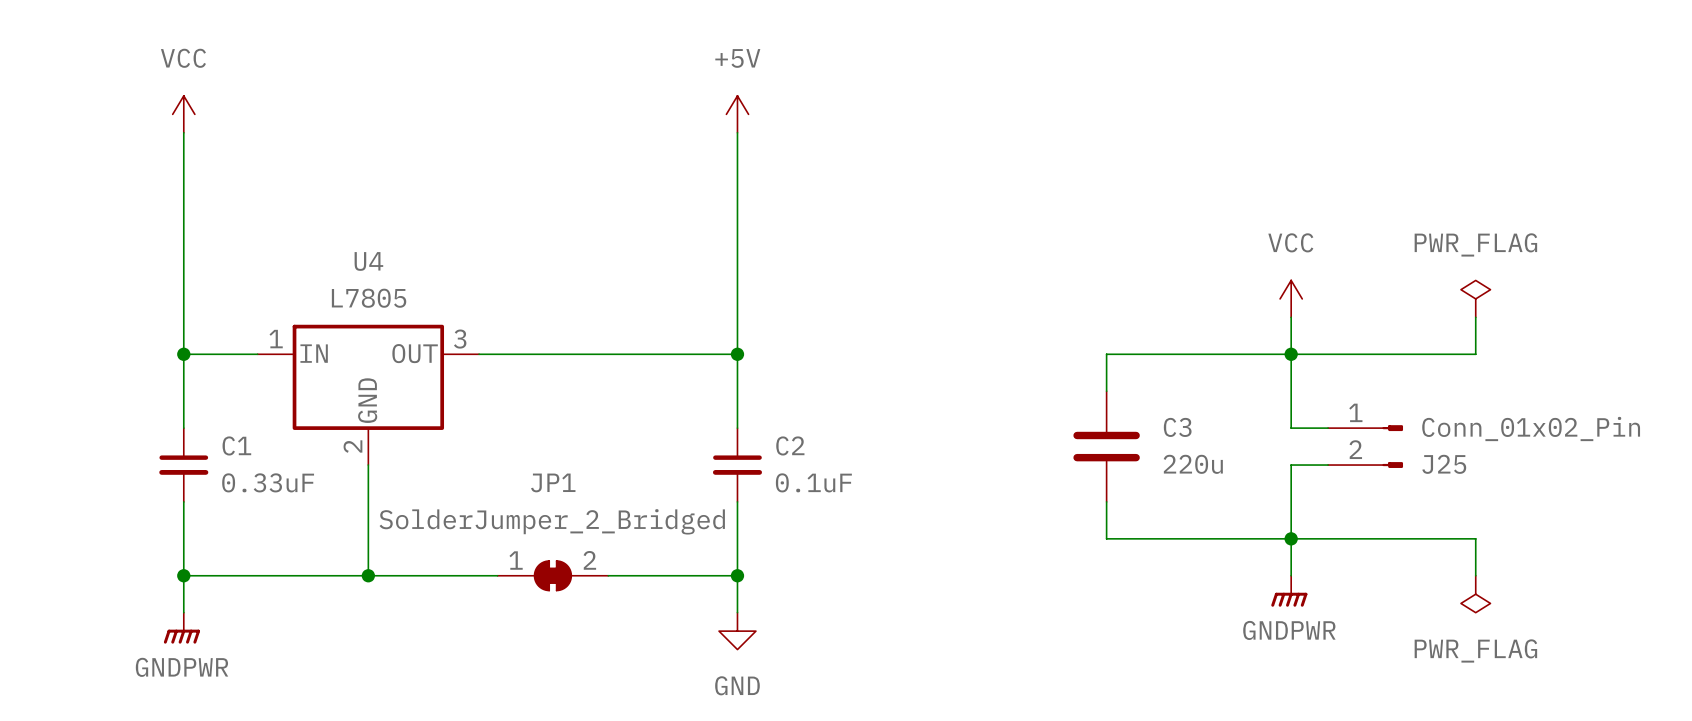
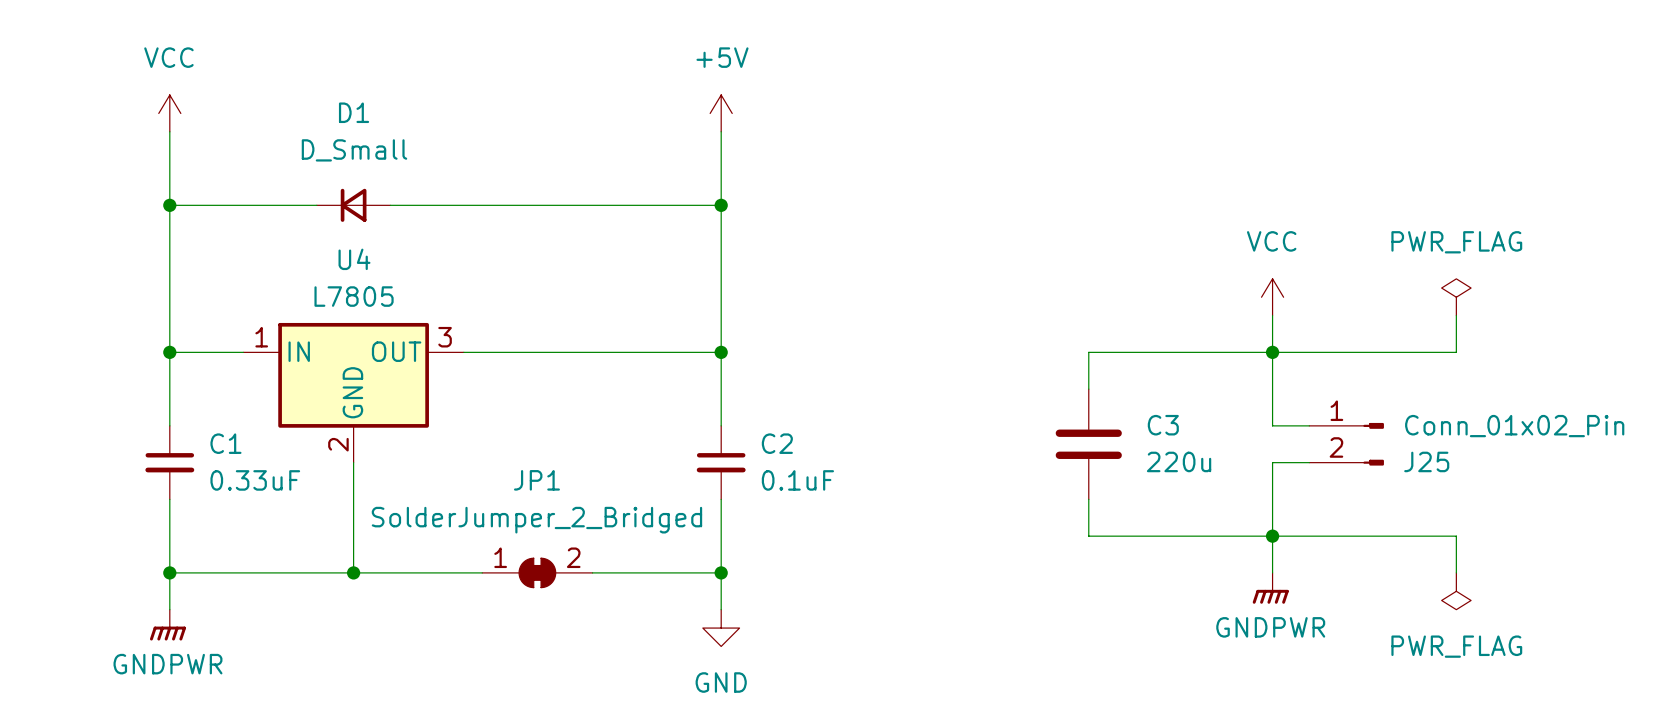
wire: none -> (169, 205) (316, 205)
junction: none -> (169, 205)
D1: none -> D_Small (353, 205)
wire: none -> (390, 205) (721, 205)
junction: none -> (721, 205)

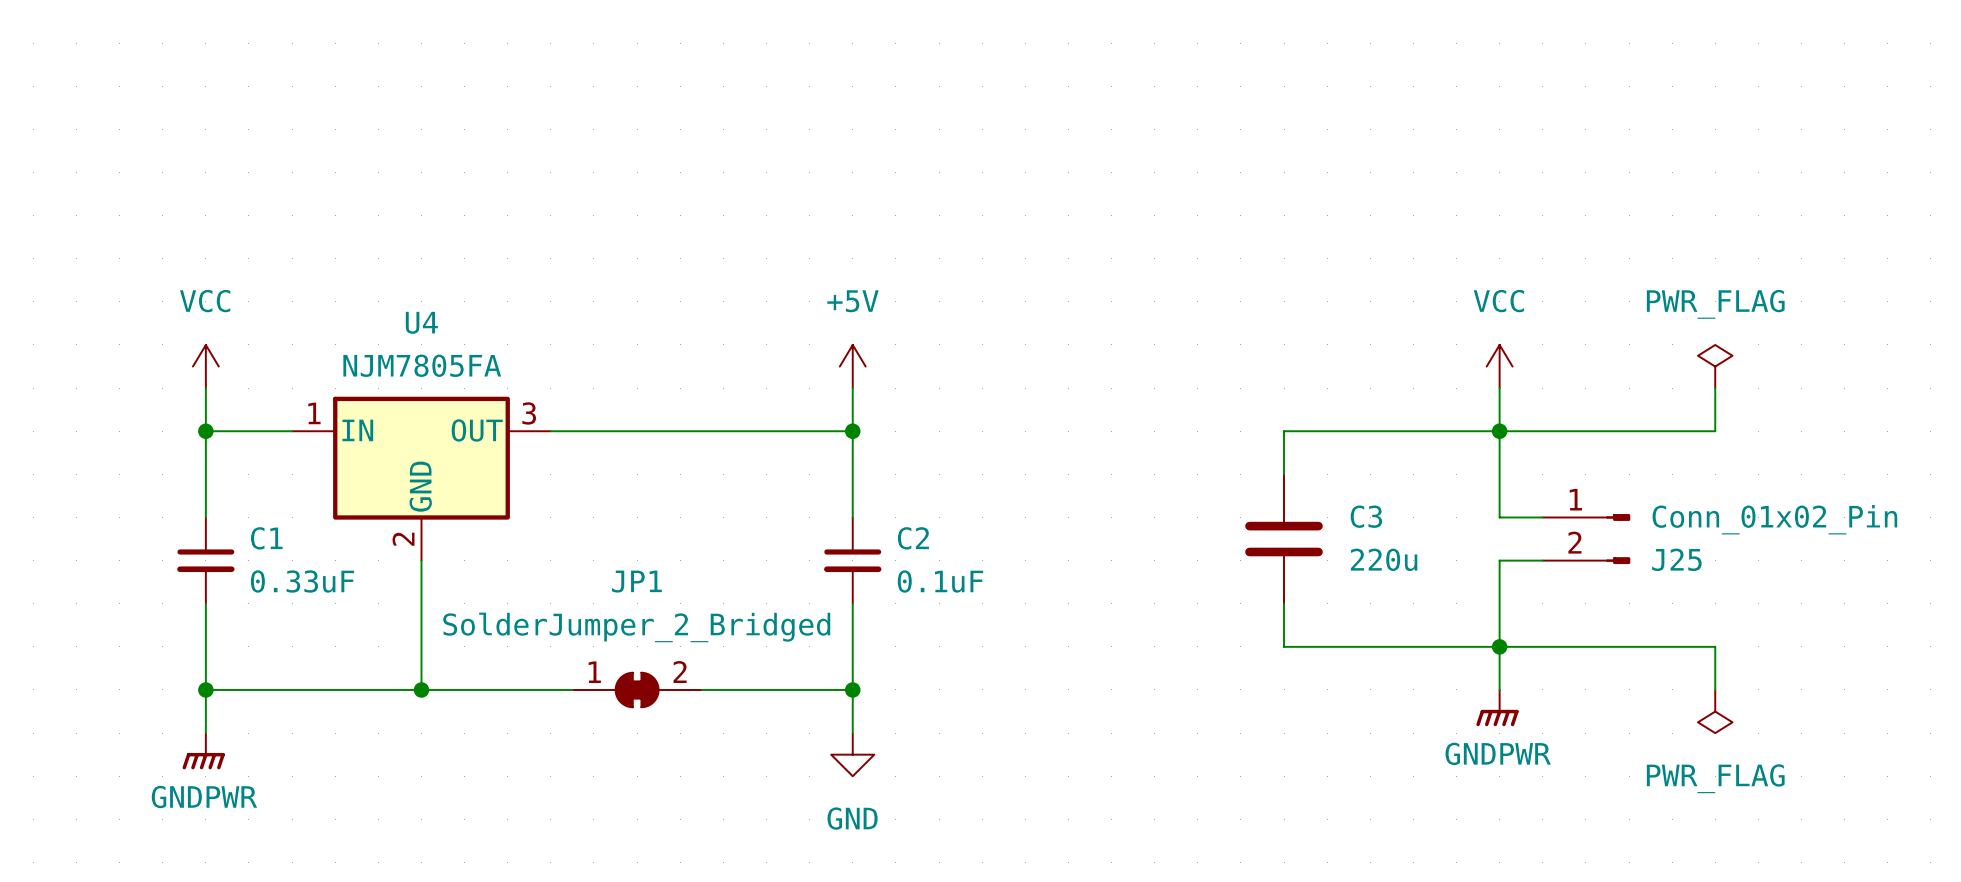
power symbol position: VCC (169, 113) -> VCC (205, 366)
power symbol position: +5V (721, 113) -> +5V (852, 366)
wire: (169, 131) (169, 315) -> none
wire: (721, 131) (721, 315) -> none
wire: (169, 205) (316, 205) -> none
junction: (169, 205) -> none
D1: D_Small (353, 205) -> none
wire: (390, 205) (721, 205) -> none
junction: (721, 205) -> none
U4 value: L7805 (354, 296) -> NJM7805FA (422, 365)

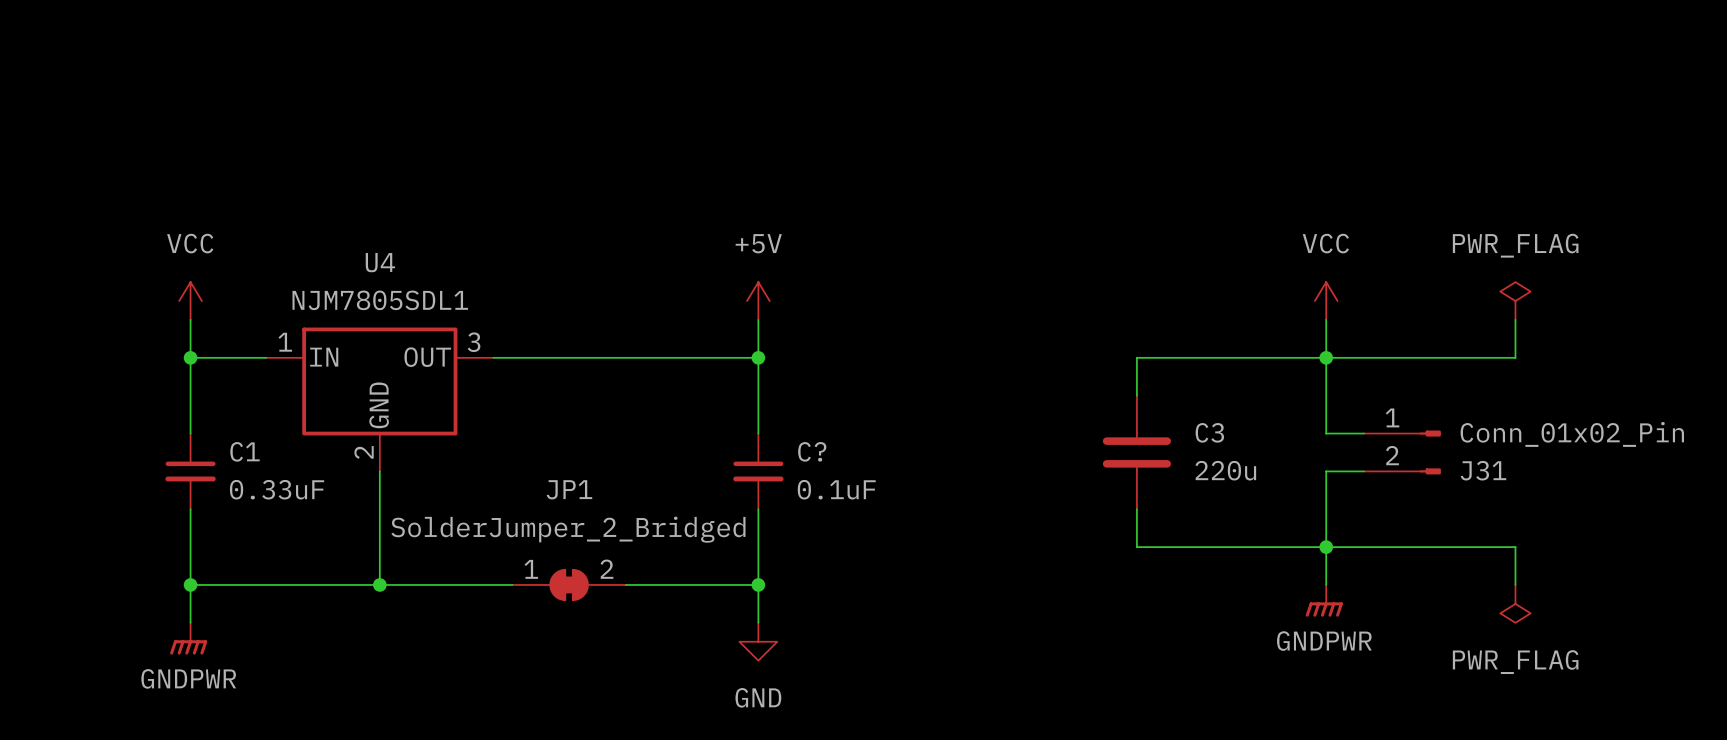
U4 value: NJM7805FA (422, 365) -> NJM7805SDL1 (380, 300)
C2 name: C2 (913, 538) -> C? (812, 451)
J25 name: J25 (1676, 559) -> J31 (1483, 470)

